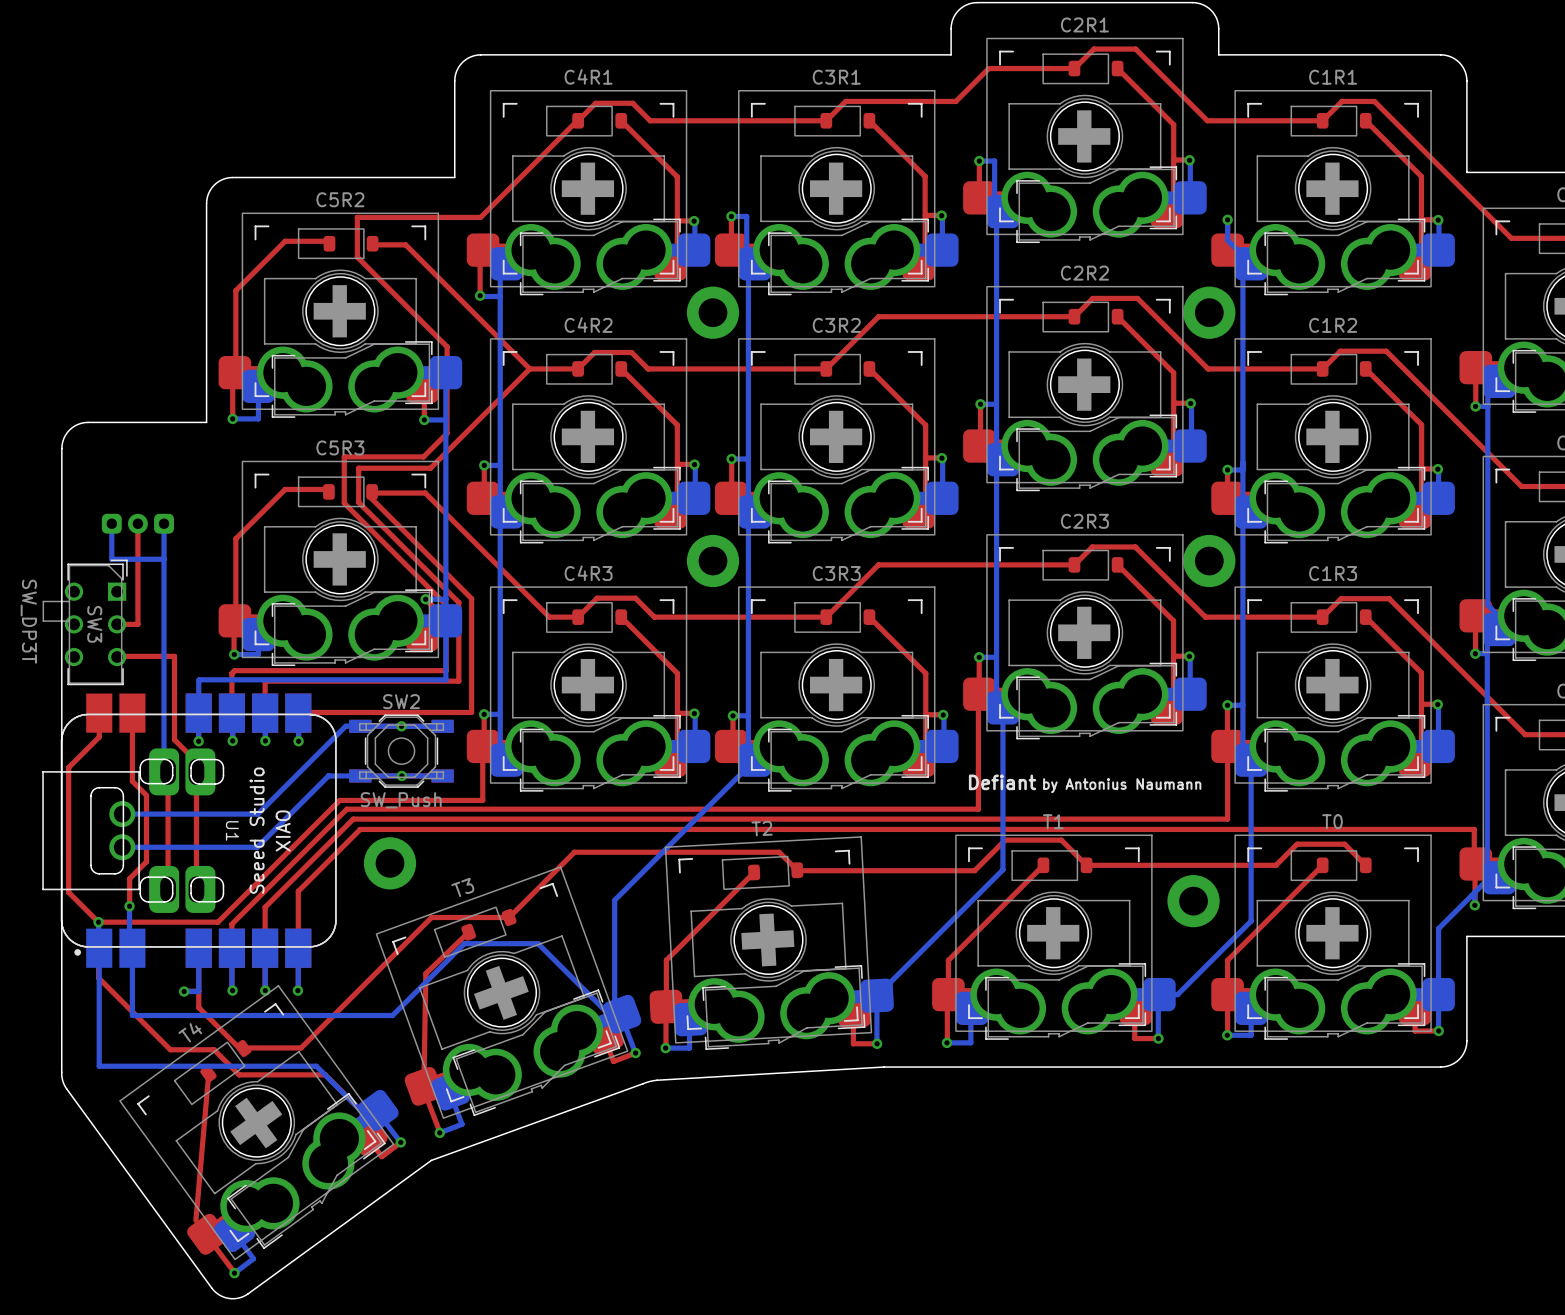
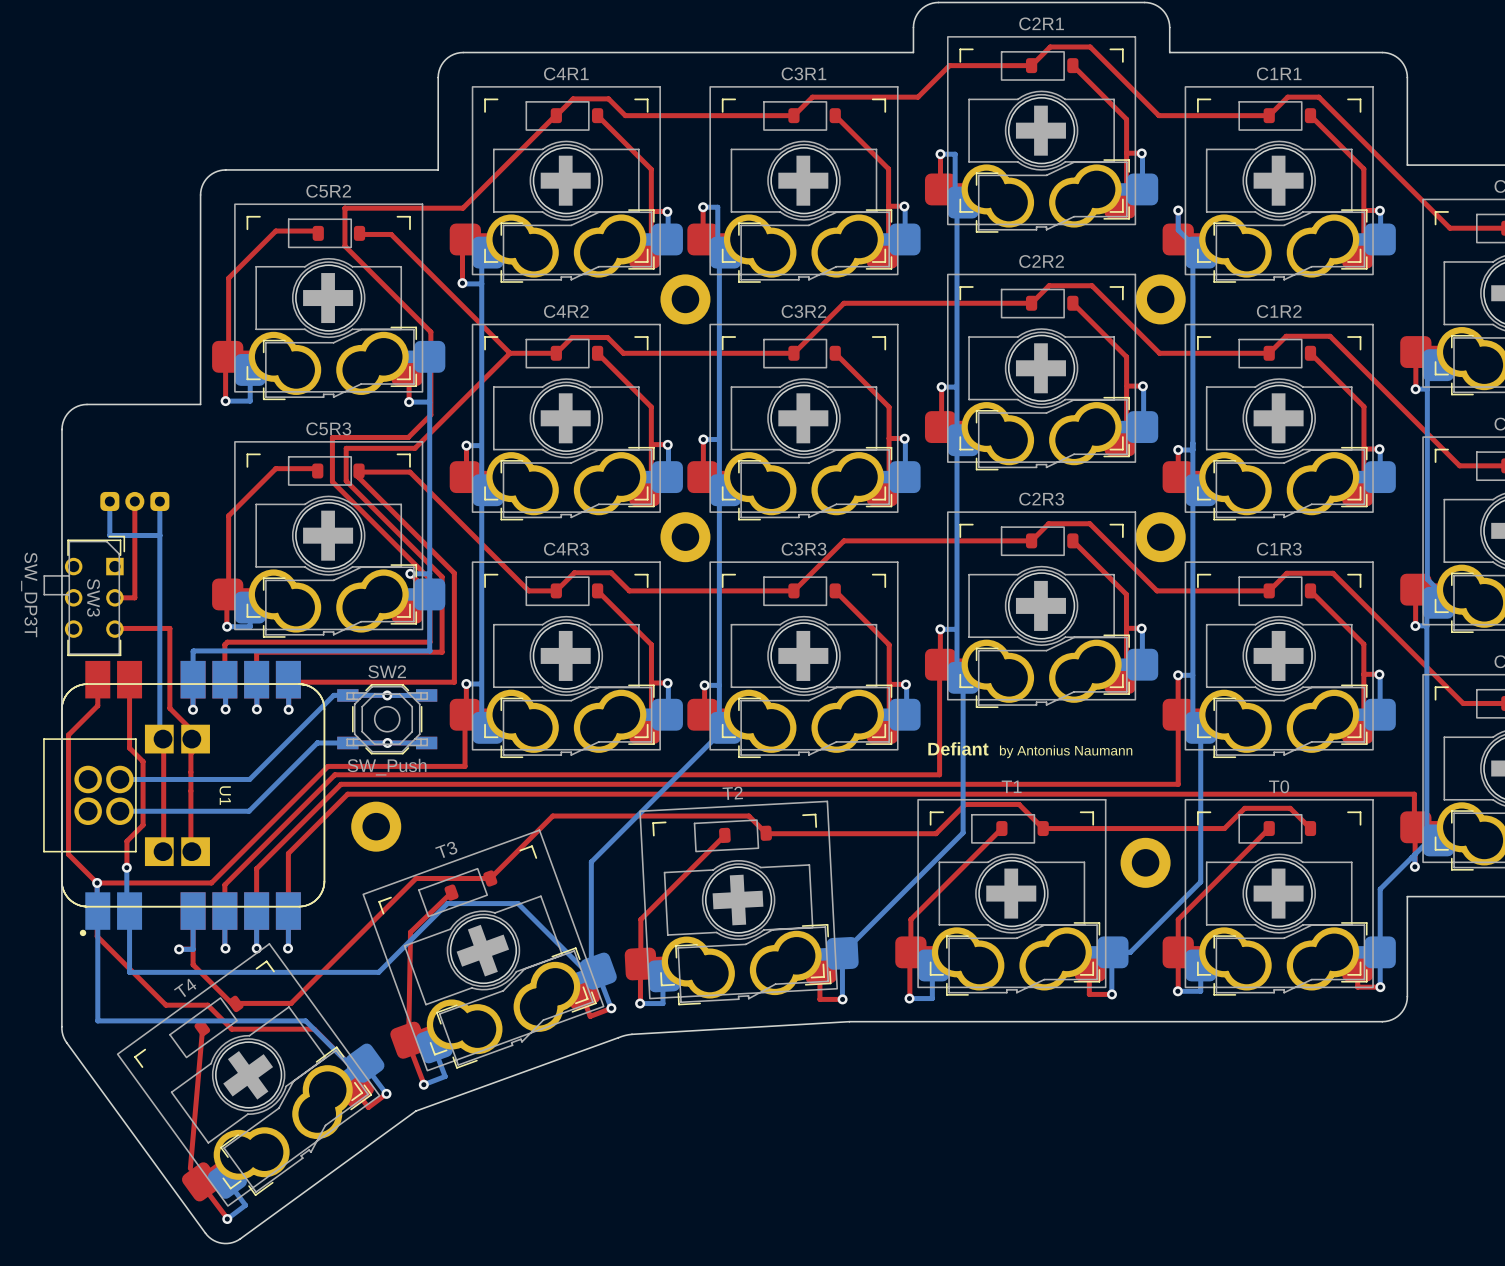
U1 footprint: [42, 693, 337, 968] -> [43, 660, 326, 937]

